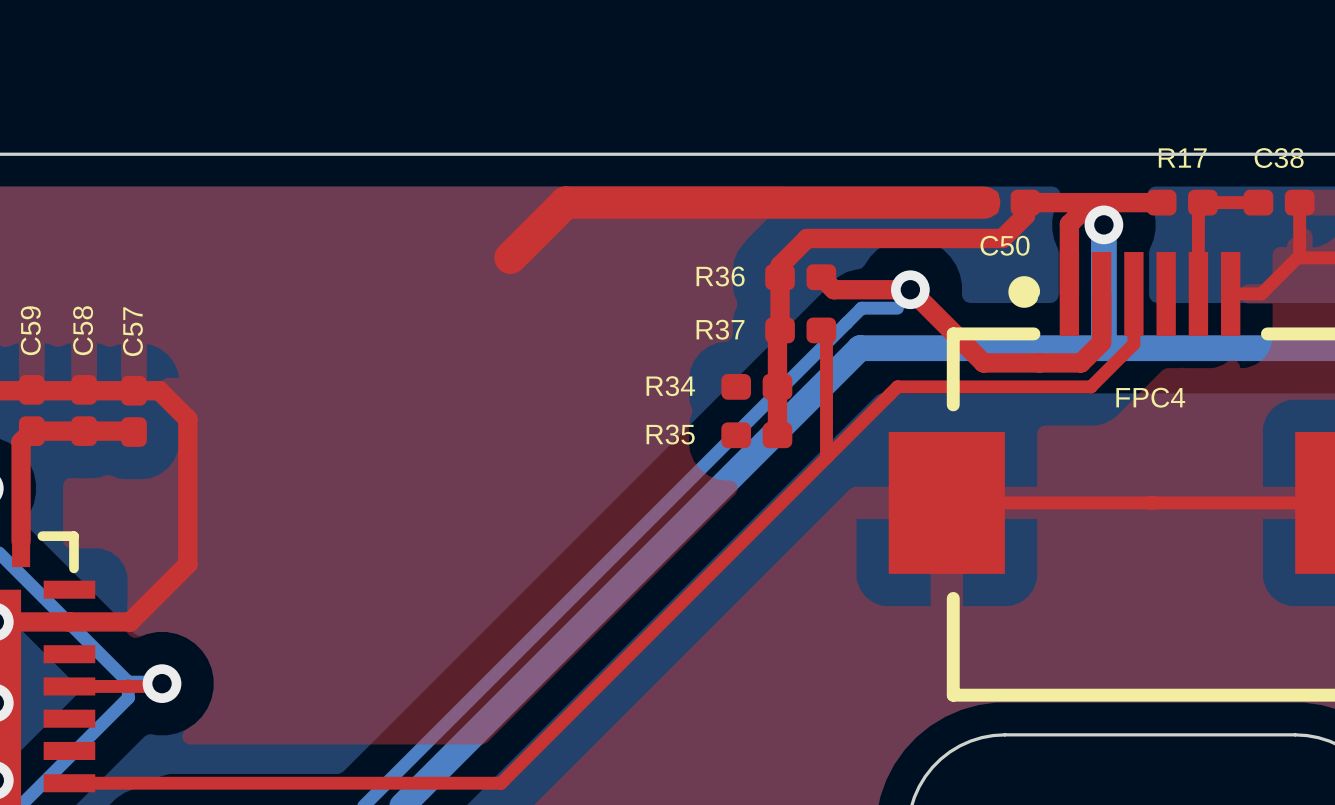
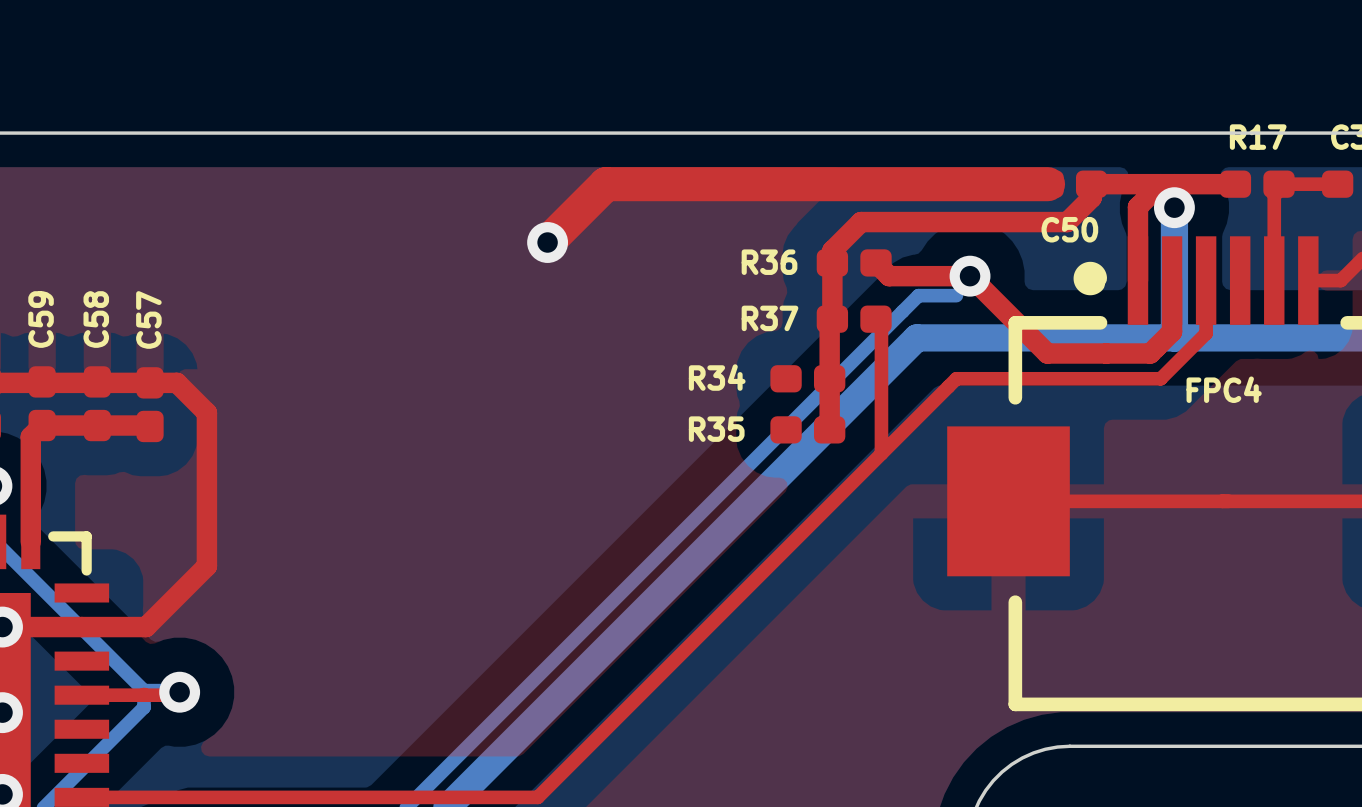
via: none -> (547, 242)

